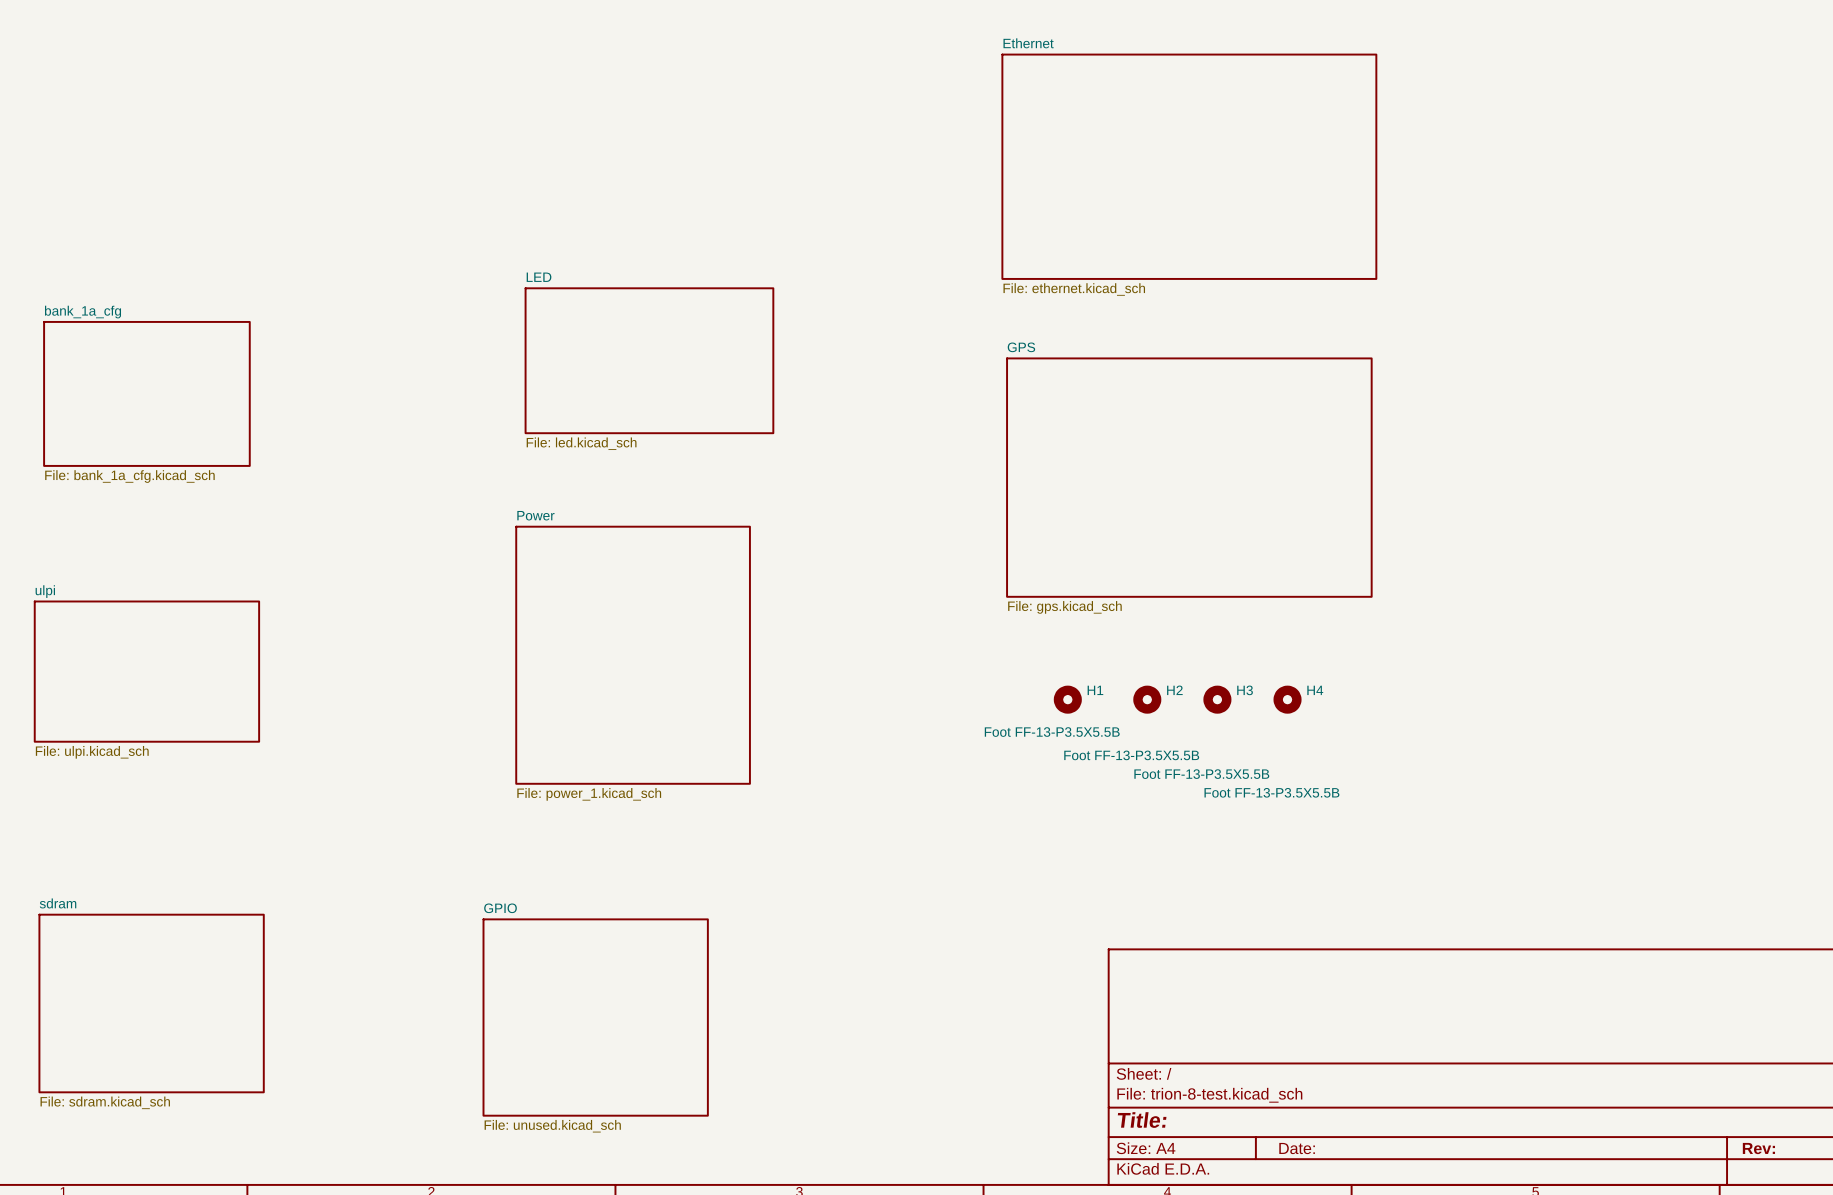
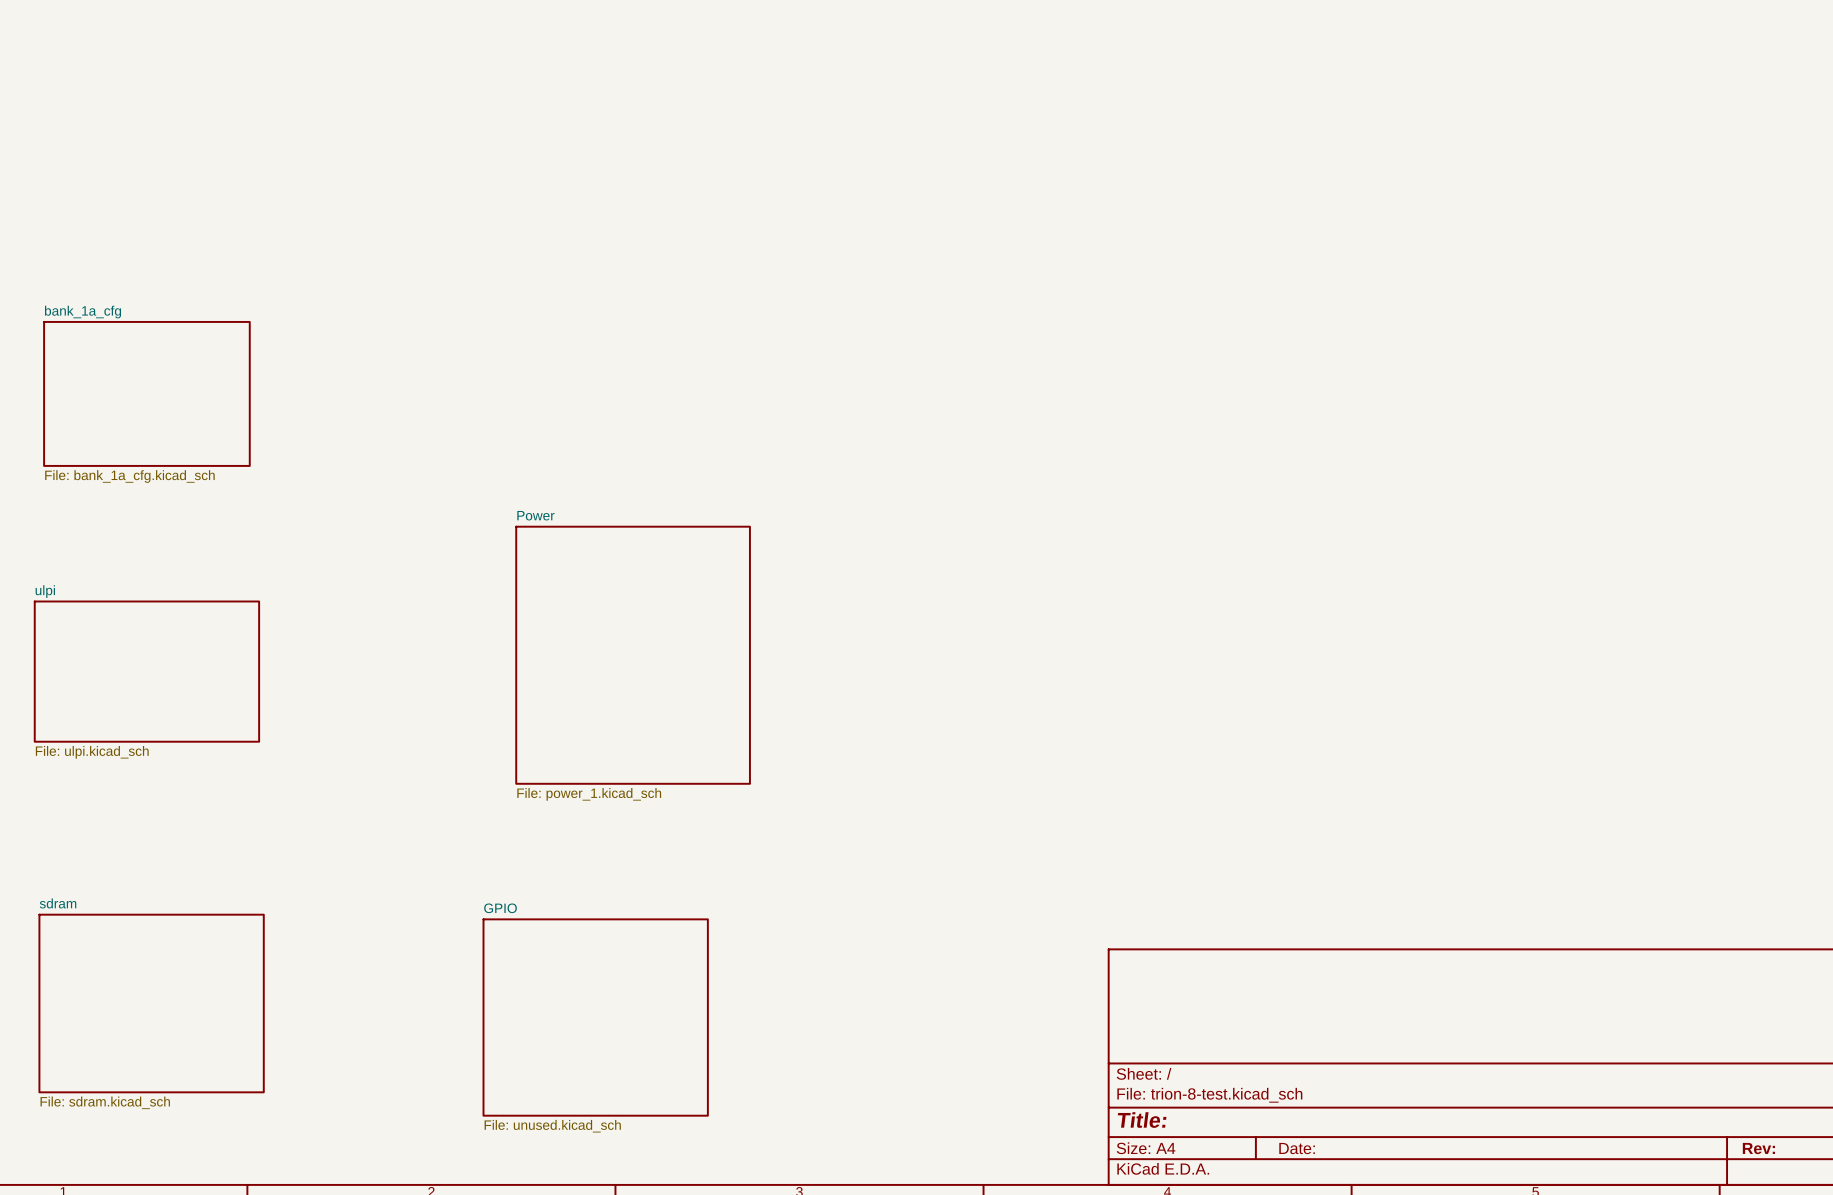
sheet Ethernet: File: ethernet.kicad_sch (1189, 166) -> none
sheet LED: File: led.kicad_sch (649, 360) -> none
sheet GPS: File: gps.kicad_sch (1189, 477) -> none
H1: Foot FF-13-P3.5X5.5B (1067, 699) -> none
H2: Foot FF-13-P3.5X5.5B (1147, 699) -> none
H3: Foot FF-13-P3.5X5.5B (1217, 699) -> none
H4: Foot FF-13-P3.5X5.5B (1287, 699) -> none

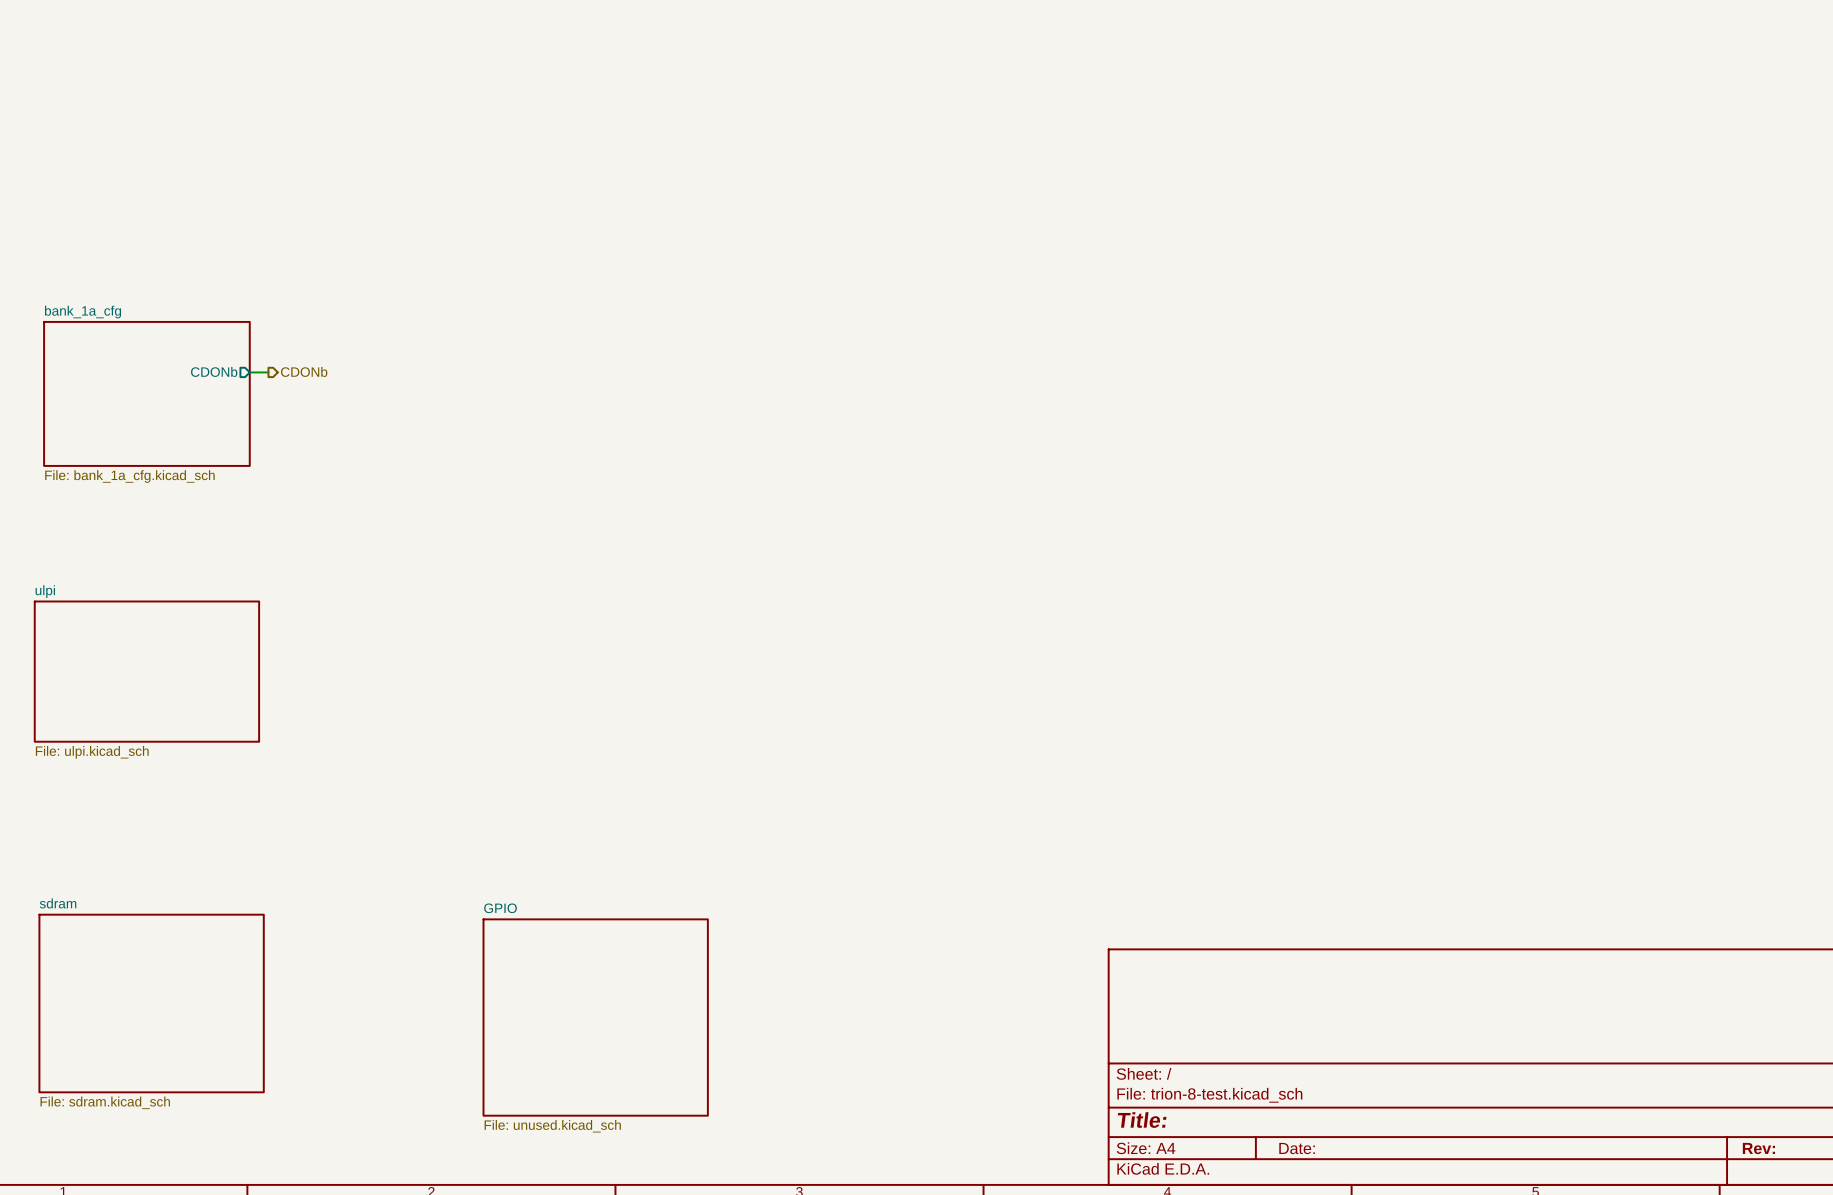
sheet pin: none -> CDONb (214, 371)
hierarchical label: none -> CDONb (304, 371)
wire: none -> (249, 372) (268, 372)
sheet Power: File: power_1.kicad_sch (633, 655) -> none

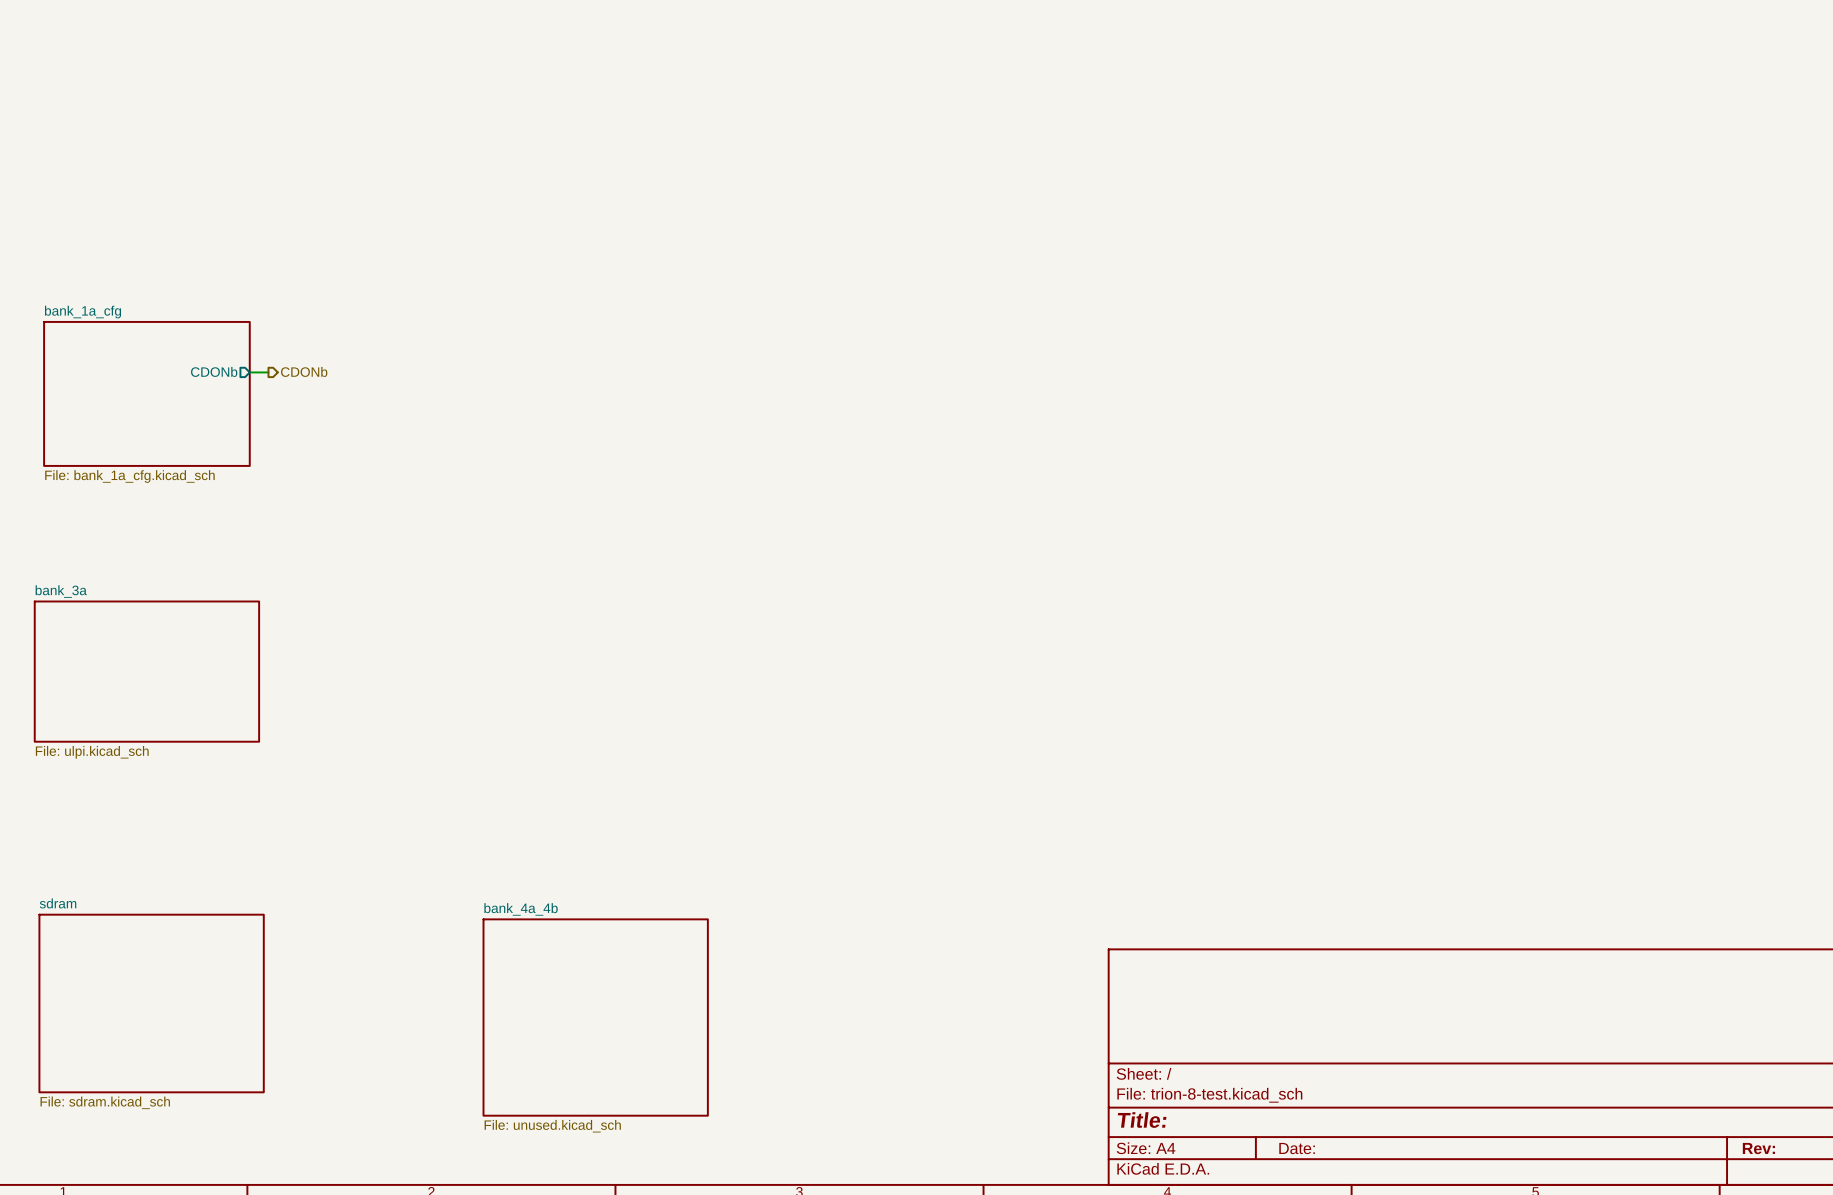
sheet ulpi name: ulpi (45, 591) -> bank_3a (61, 591)
sheet GPIO name: GPIO (500, 908) -> bank_4a_4b (521, 909)

